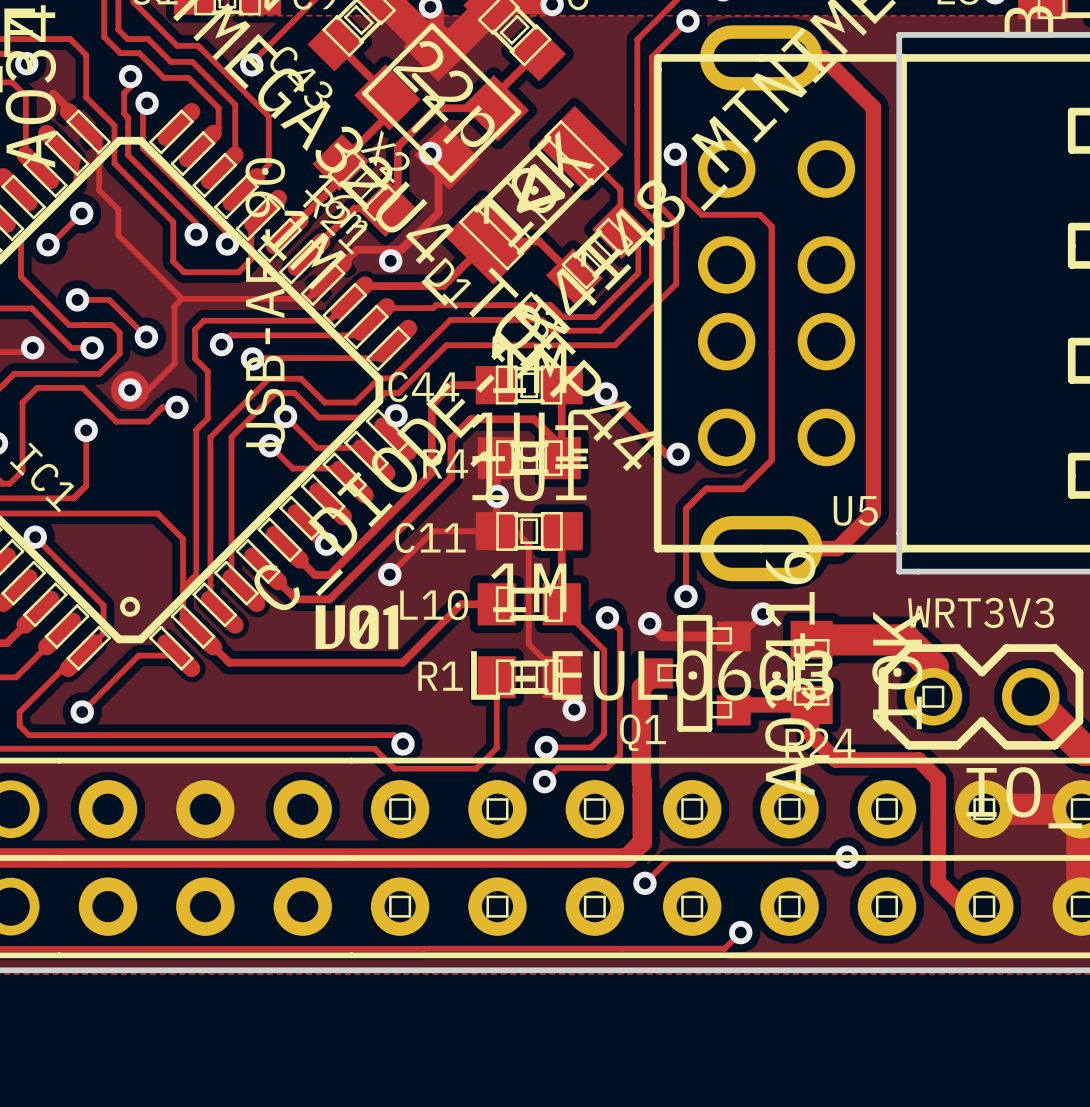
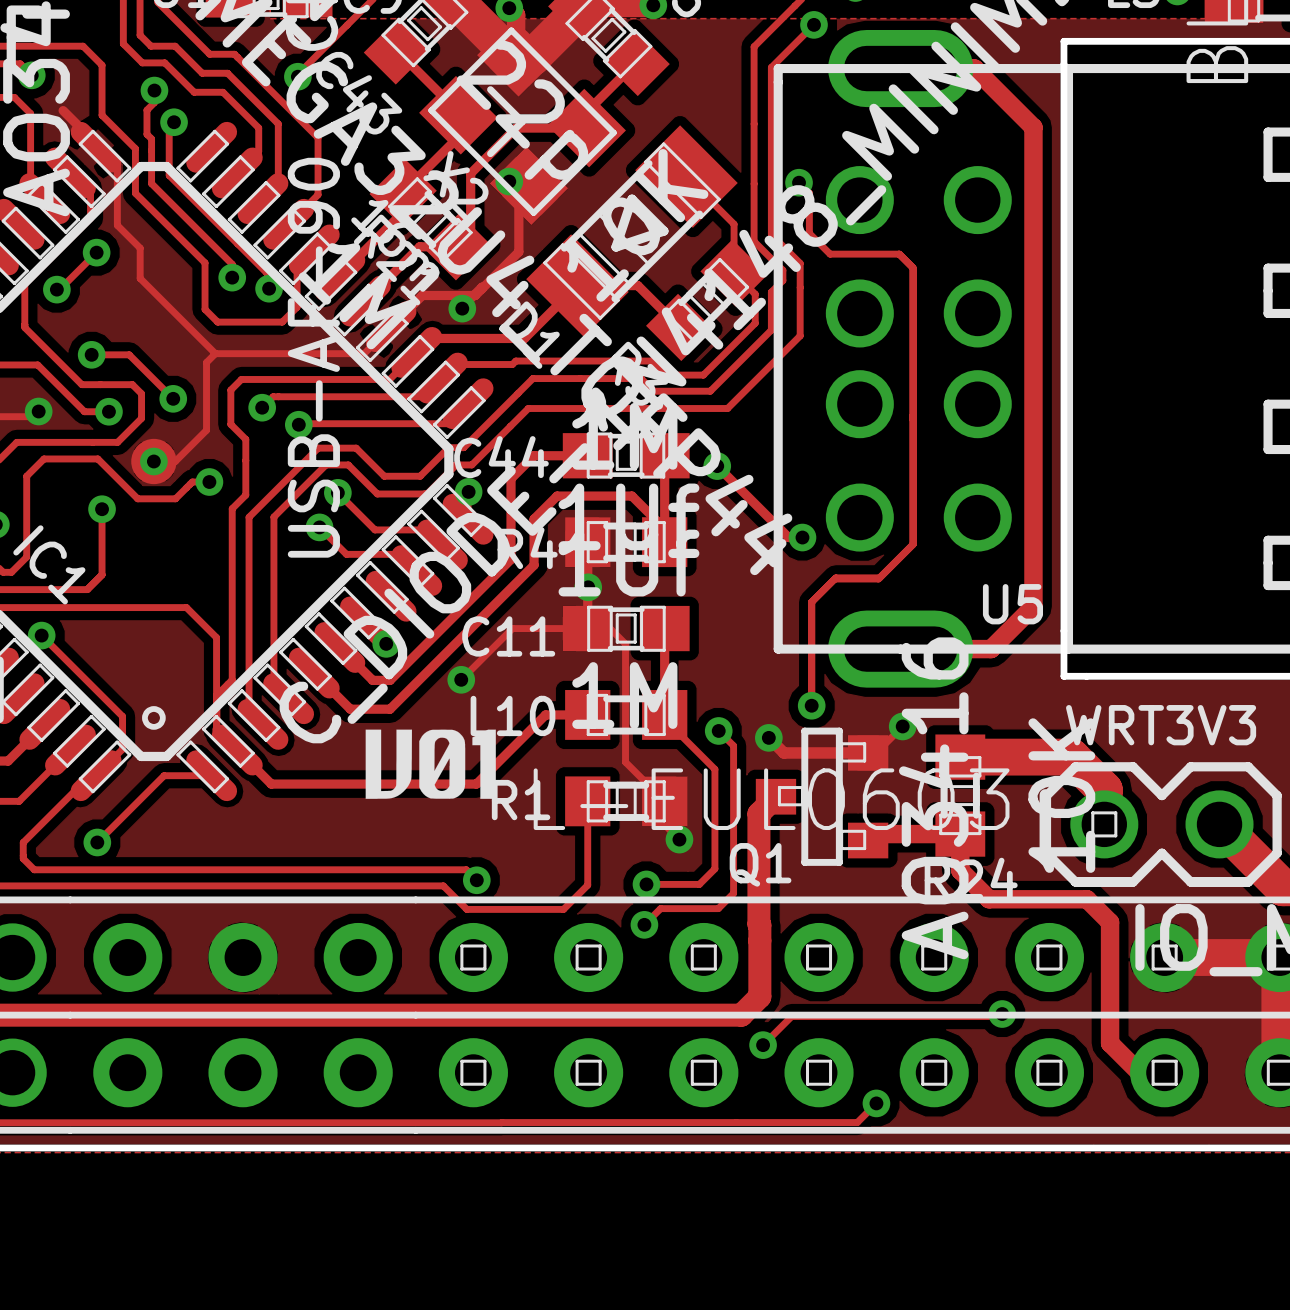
drawing shape: [315, 605, 399, 650] -> [365, 729, 496, 799]

